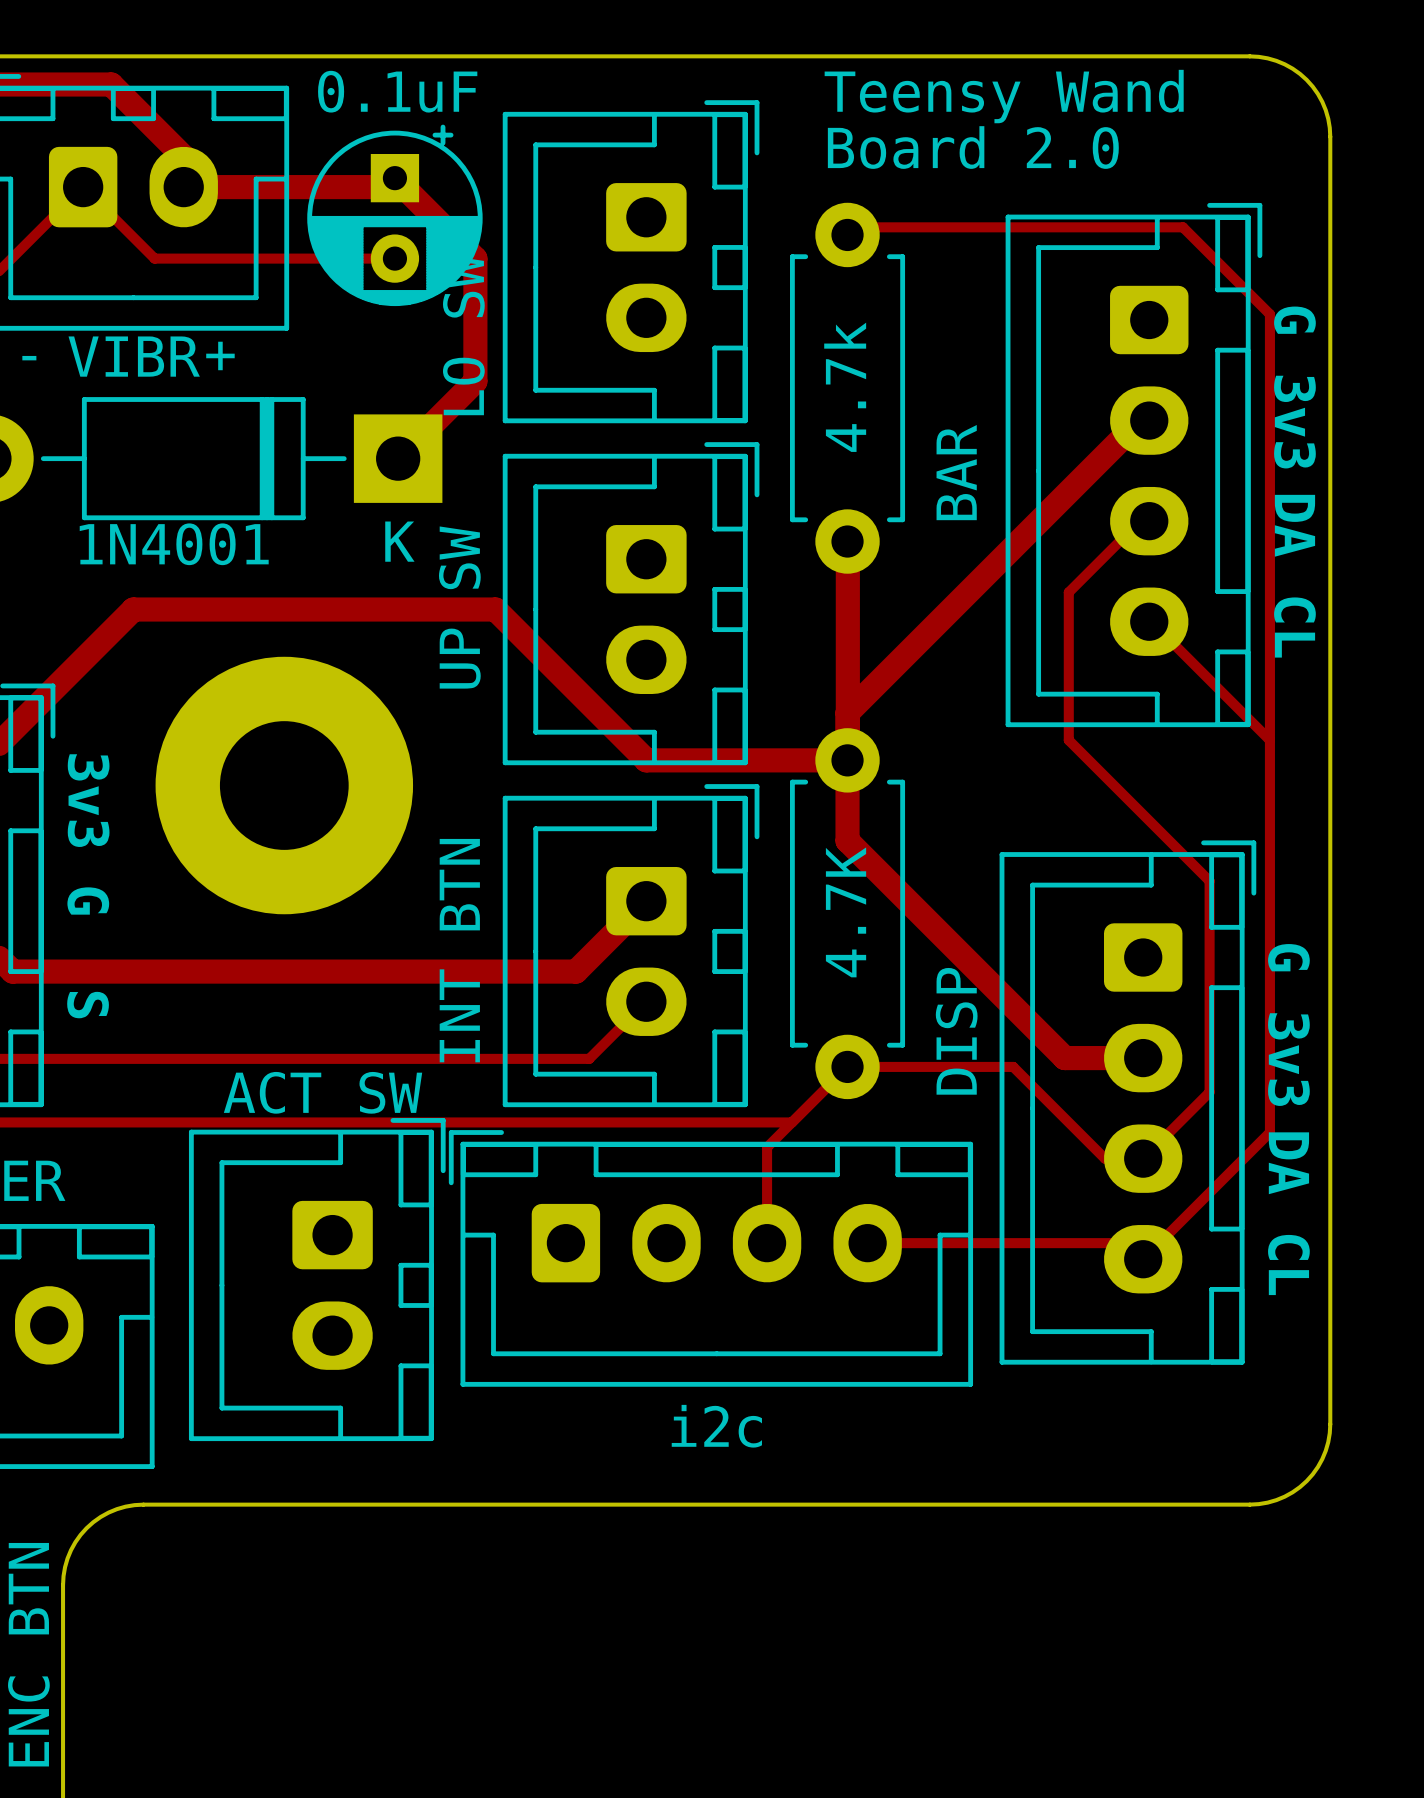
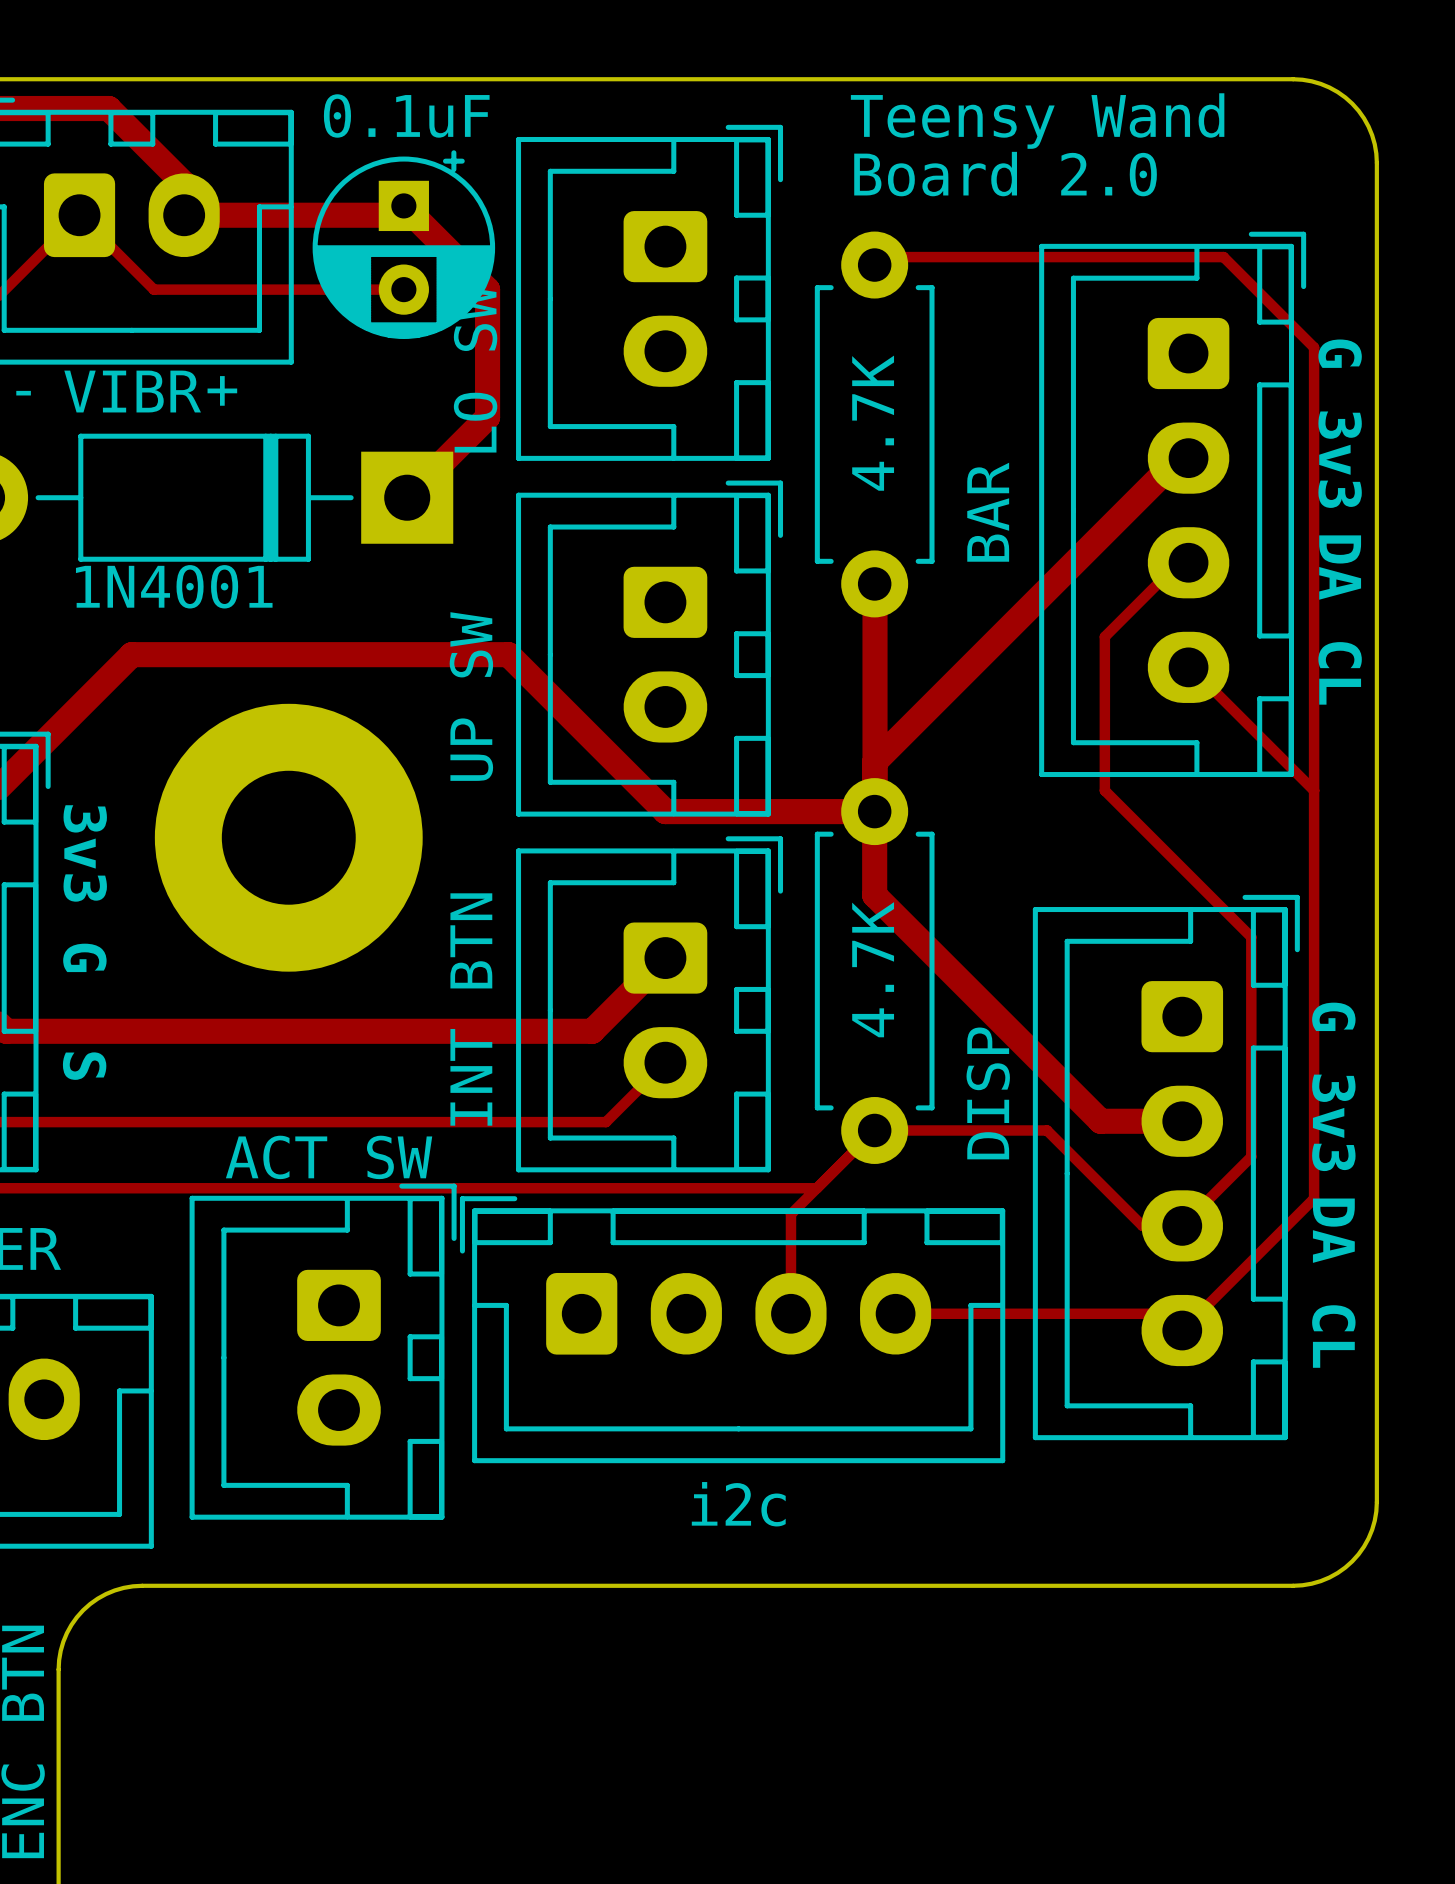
part value: 4.7k (845, 387) -> 4.7K (873, 423)
part text: K (399, 541) -> none
part value position: UP SW (459, 607) -> UP SW (471, 696)

